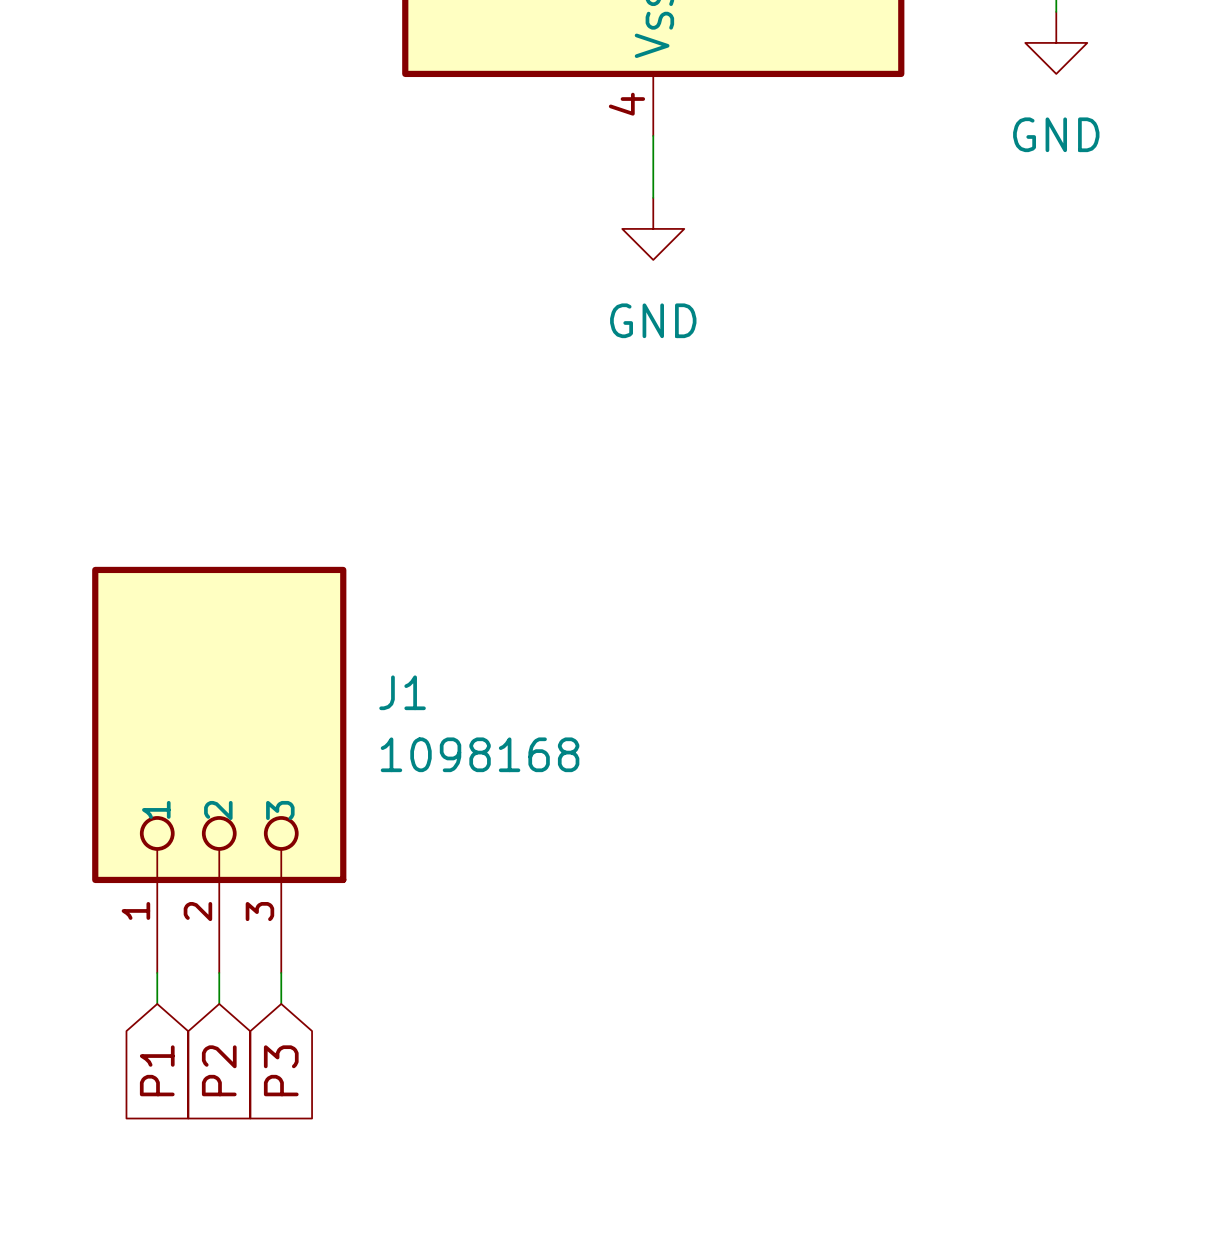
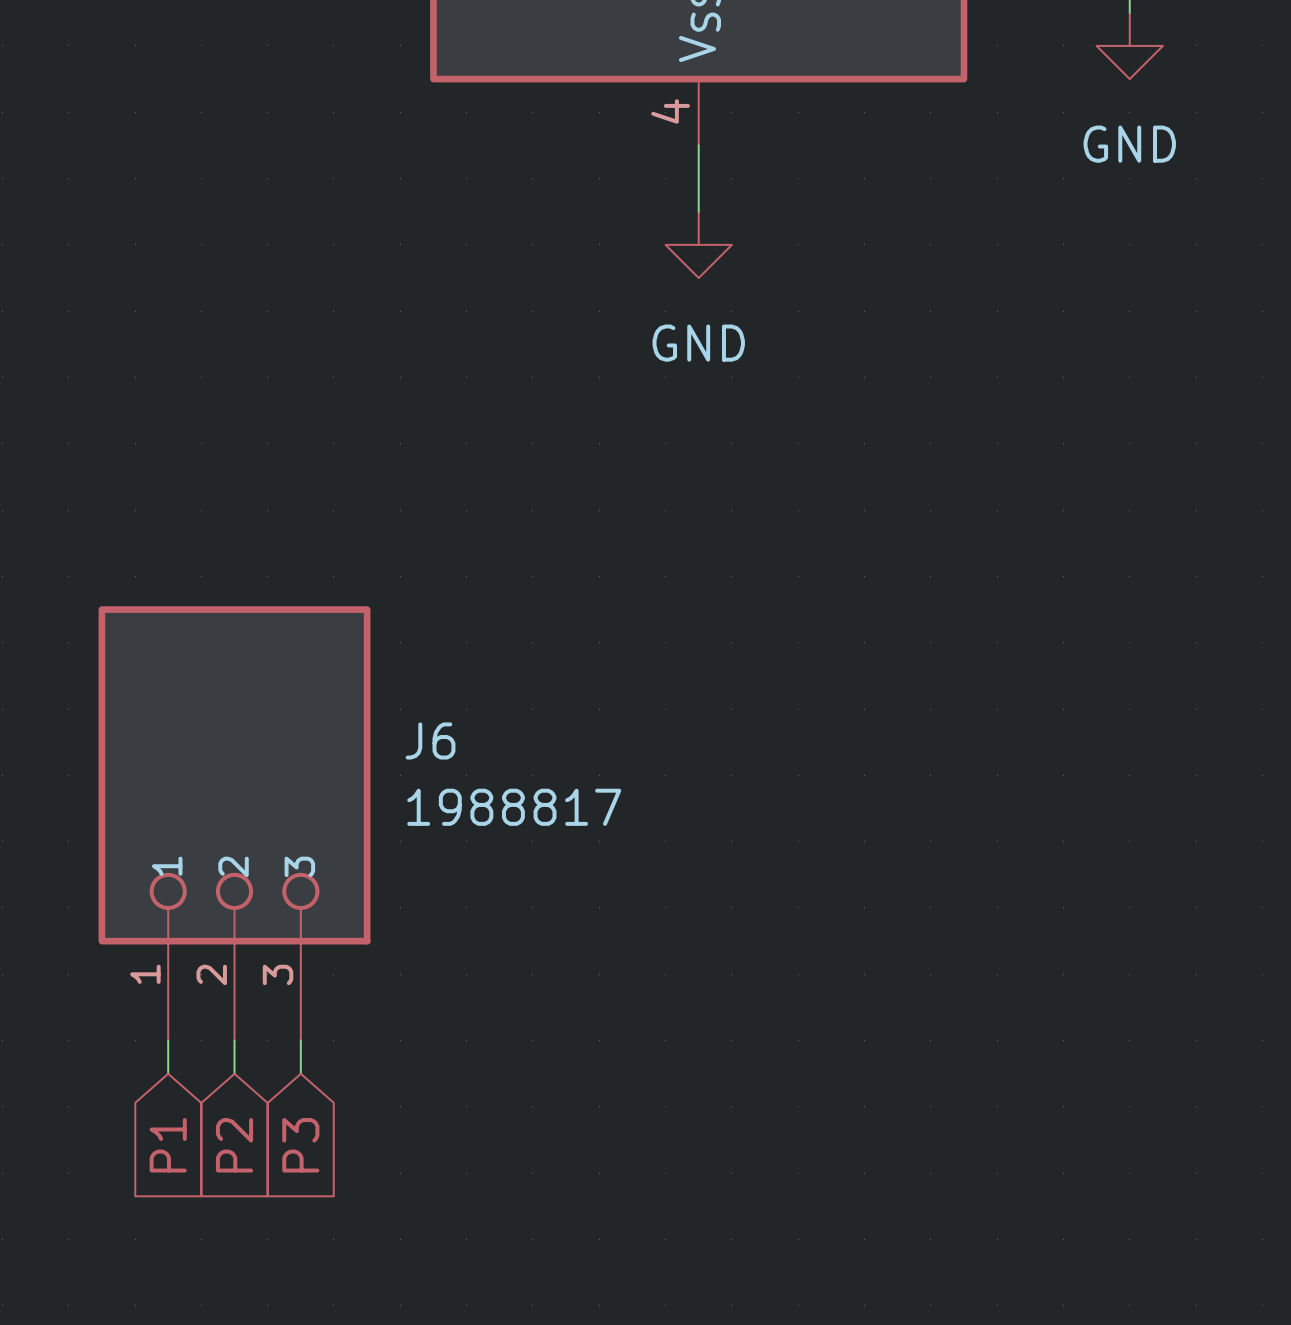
J1 name: J1 (402, 692) -> J6 (430, 740)
J1 value: 1098168 (480, 754) -> 1988817 (514, 807)

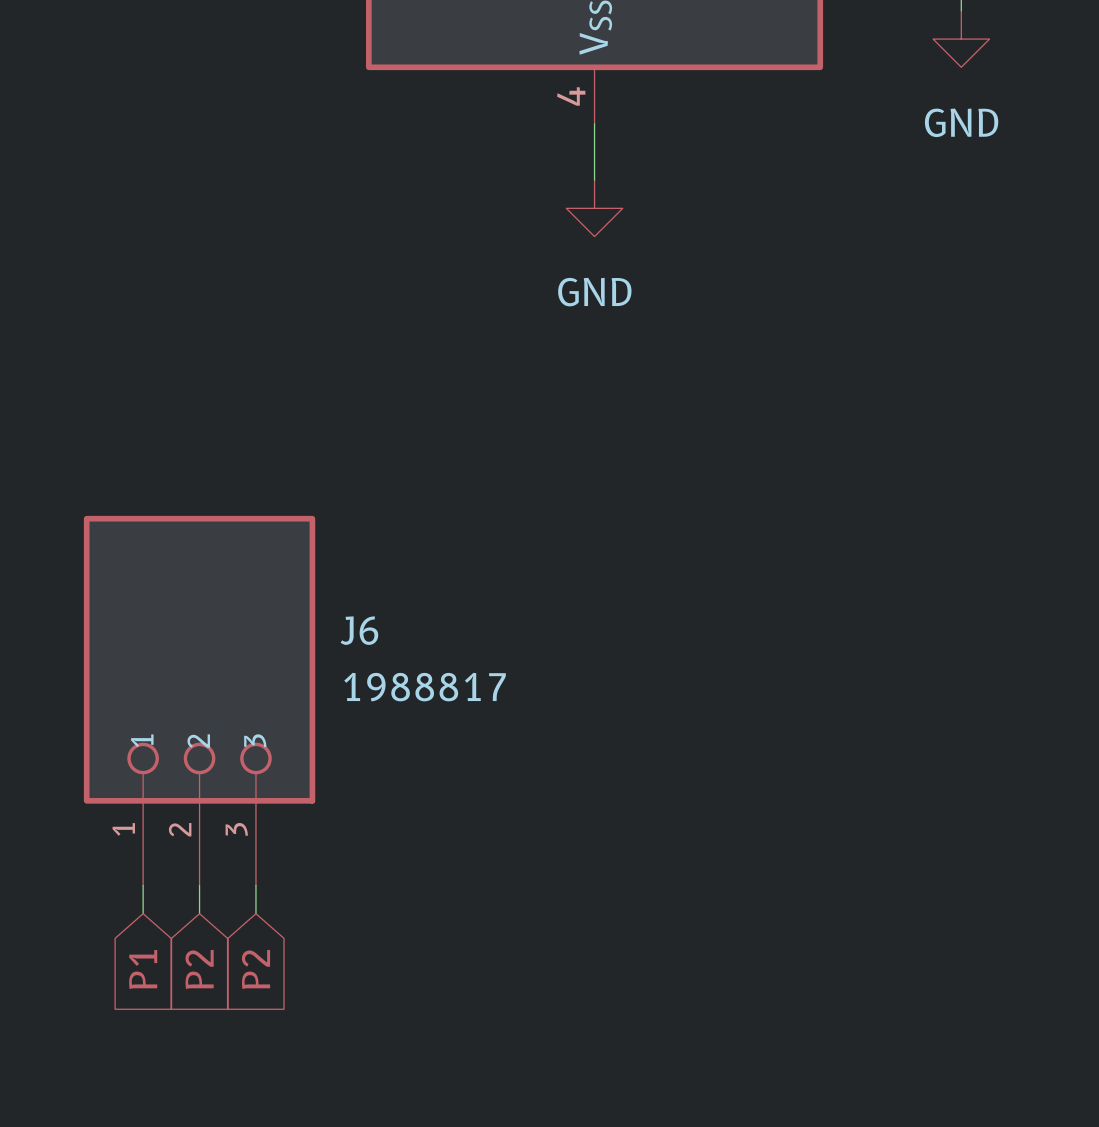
global label: P3 (300, 1145) -> P2 (256, 969)

